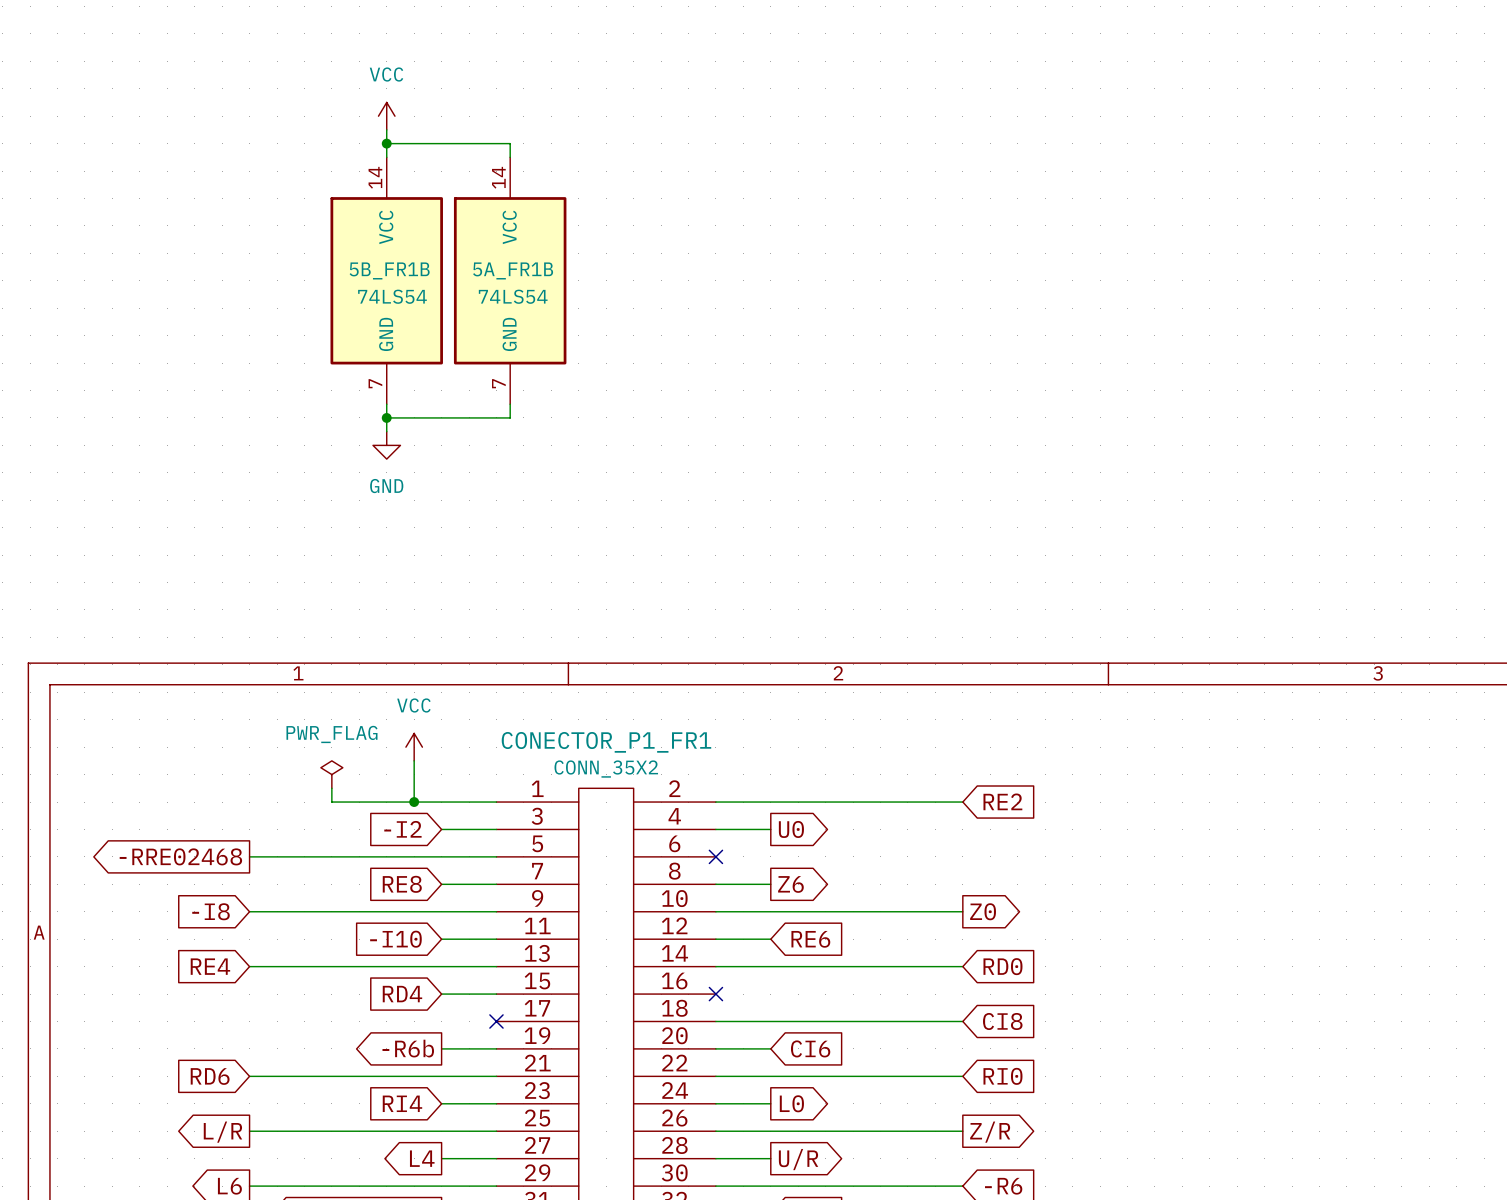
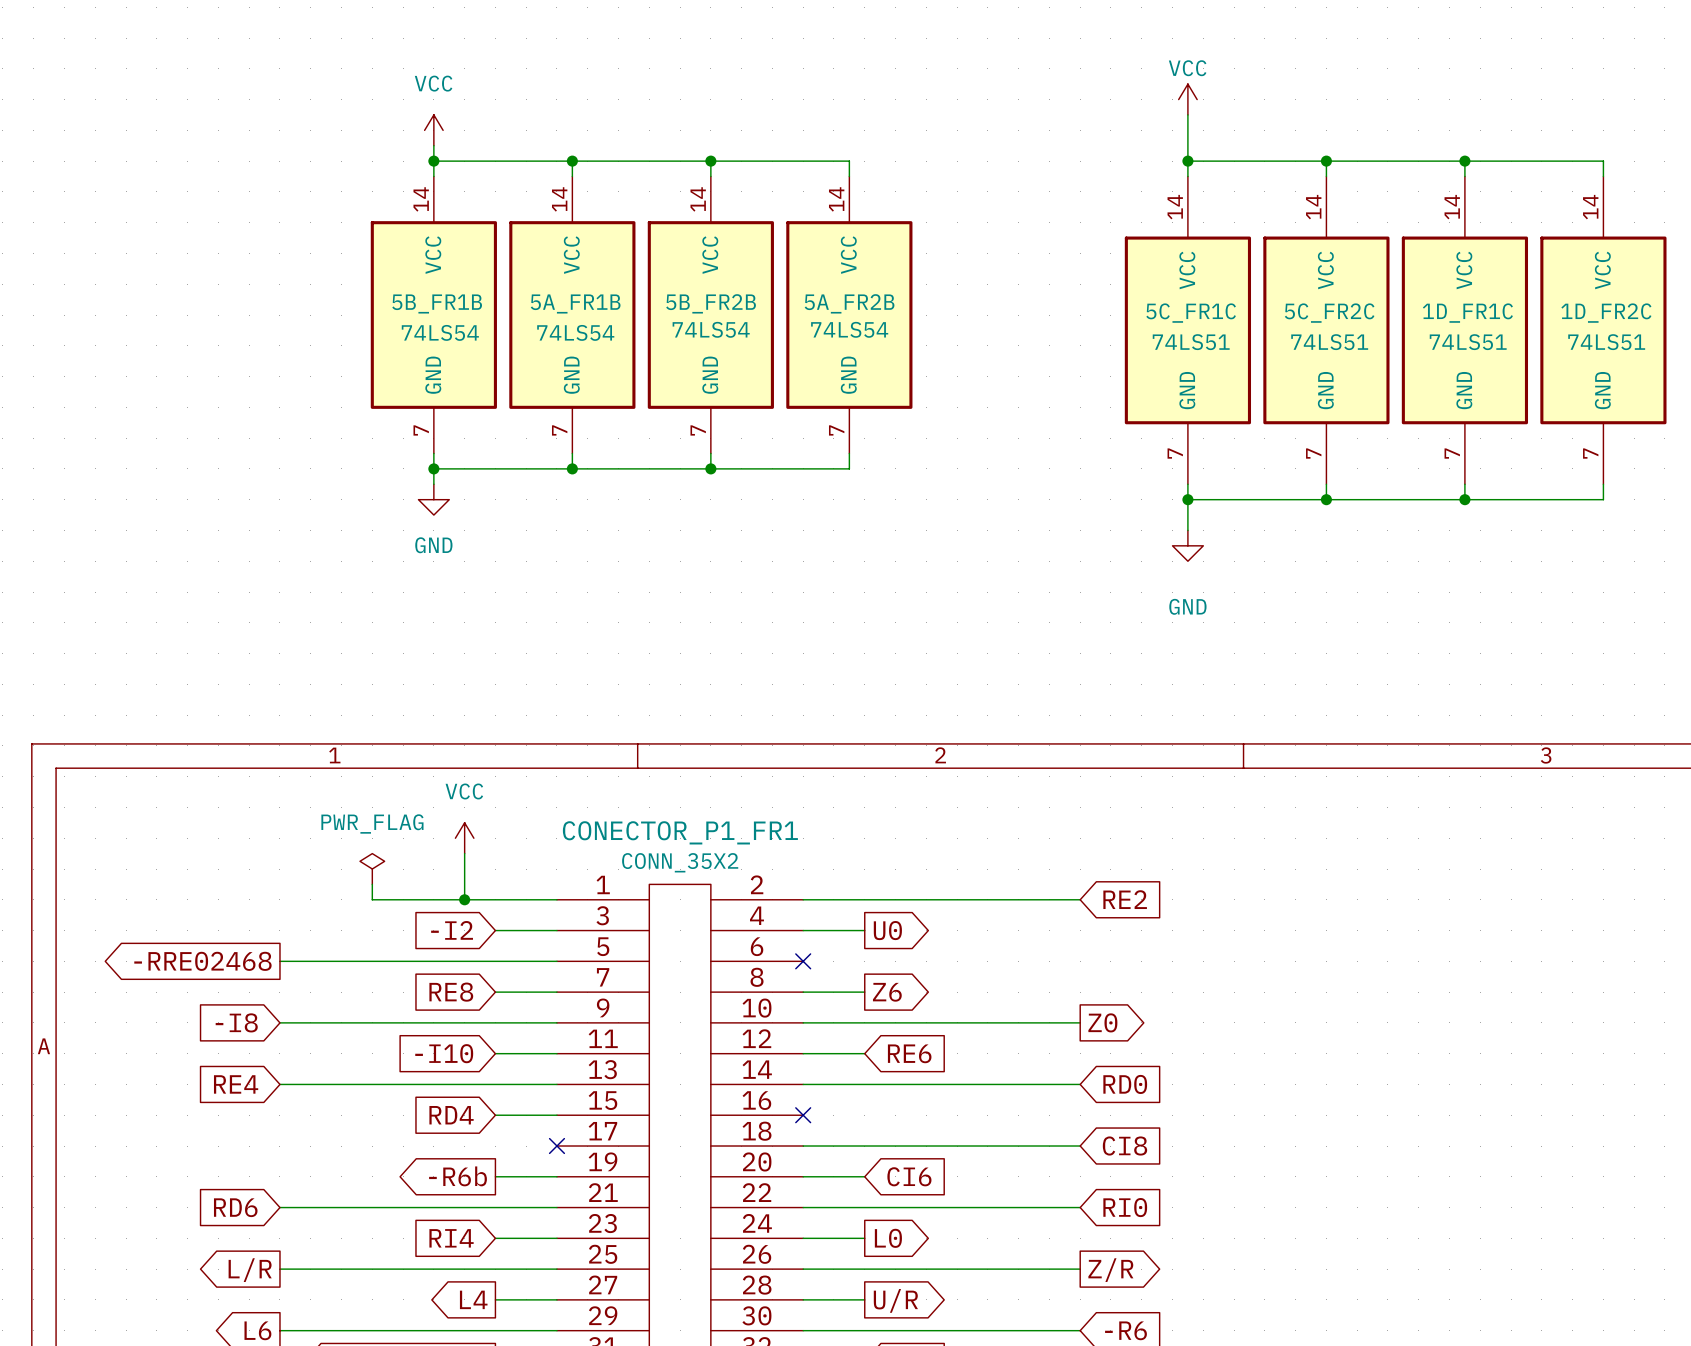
power symbol: none -> VCC (1187, 99)
wire: none -> (1187, 114) (1187, 176)
wire: none -> (572, 161) (849, 161) (849, 176)
junction: none -> (572, 161)
wire: none -> (710, 161) (710, 176)
junction: none -> (710, 161)
wire: none -> (1187, 161) (1603, 161) (1603, 176)
junction: none -> (1187, 161)
wire: none -> (1326, 161) (1326, 176)
junction: none -> (1326, 161)
wire: none -> (1464, 161) (1464, 176)
junction: none -> (1464, 161)
5B_FR2B: none -> 74LS54 (710, 315)
5A_FR2B: none -> 74LS54 (849, 315)
5C_FR1C: none -> 74LS51 (1187, 330)
5C_FR2C: none -> 74LS51 (1326, 330)
1D_FR1C: none -> 74LS51 (1464, 330)
1D_FR2C: none -> 74LS51 (1603, 330)
wire: none -> (710, 453) (710, 468)
wire: none -> (849, 453) (849, 468) (572, 468)
junction: none -> (572, 468)
junction: none -> (710, 468)
wire: none -> (1187, 484) (1187, 530)
wire: none -> (1326, 484) (1326, 499)
wire: none -> (1464, 484) (1464, 499)
wire: none -> (1603, 484) (1603, 499) (1187, 499)
junction: none -> (1187, 499)
junction: none -> (1326, 499)
junction: none -> (1464, 499)
power symbol: none -> GND (1187, 545)

